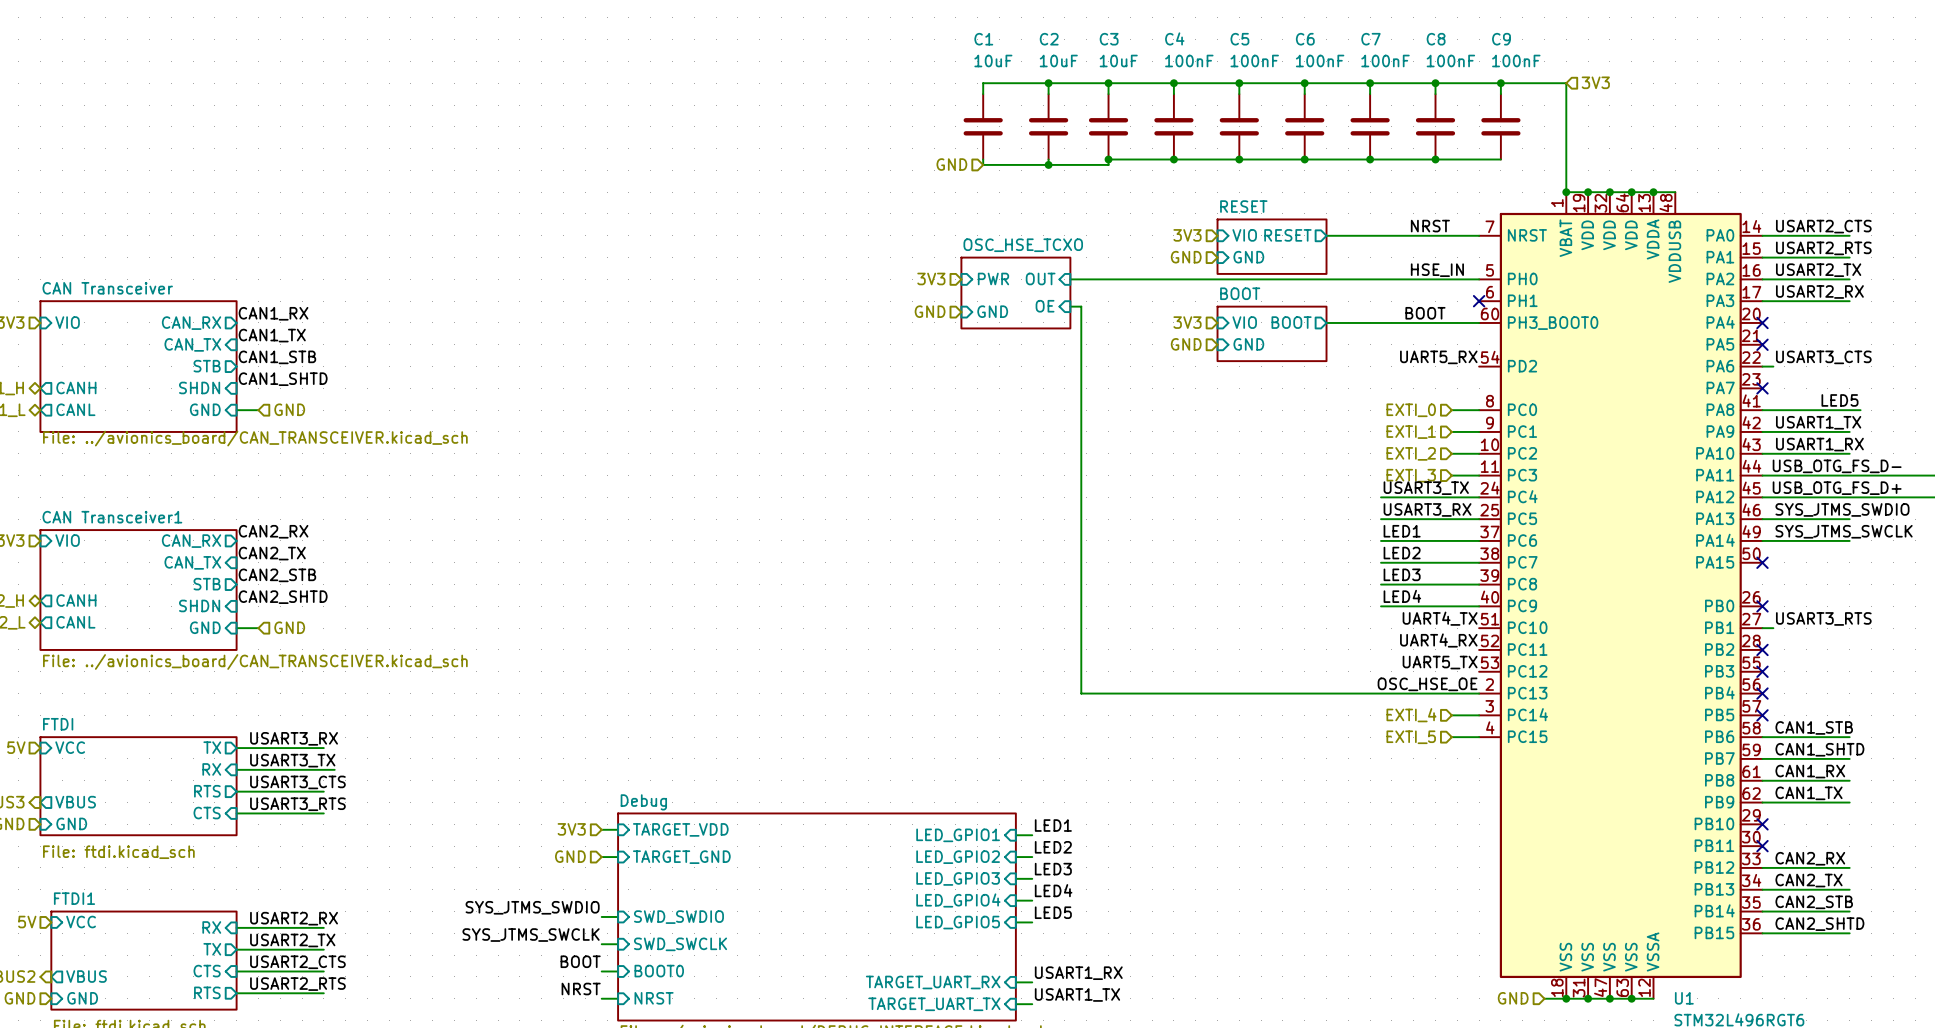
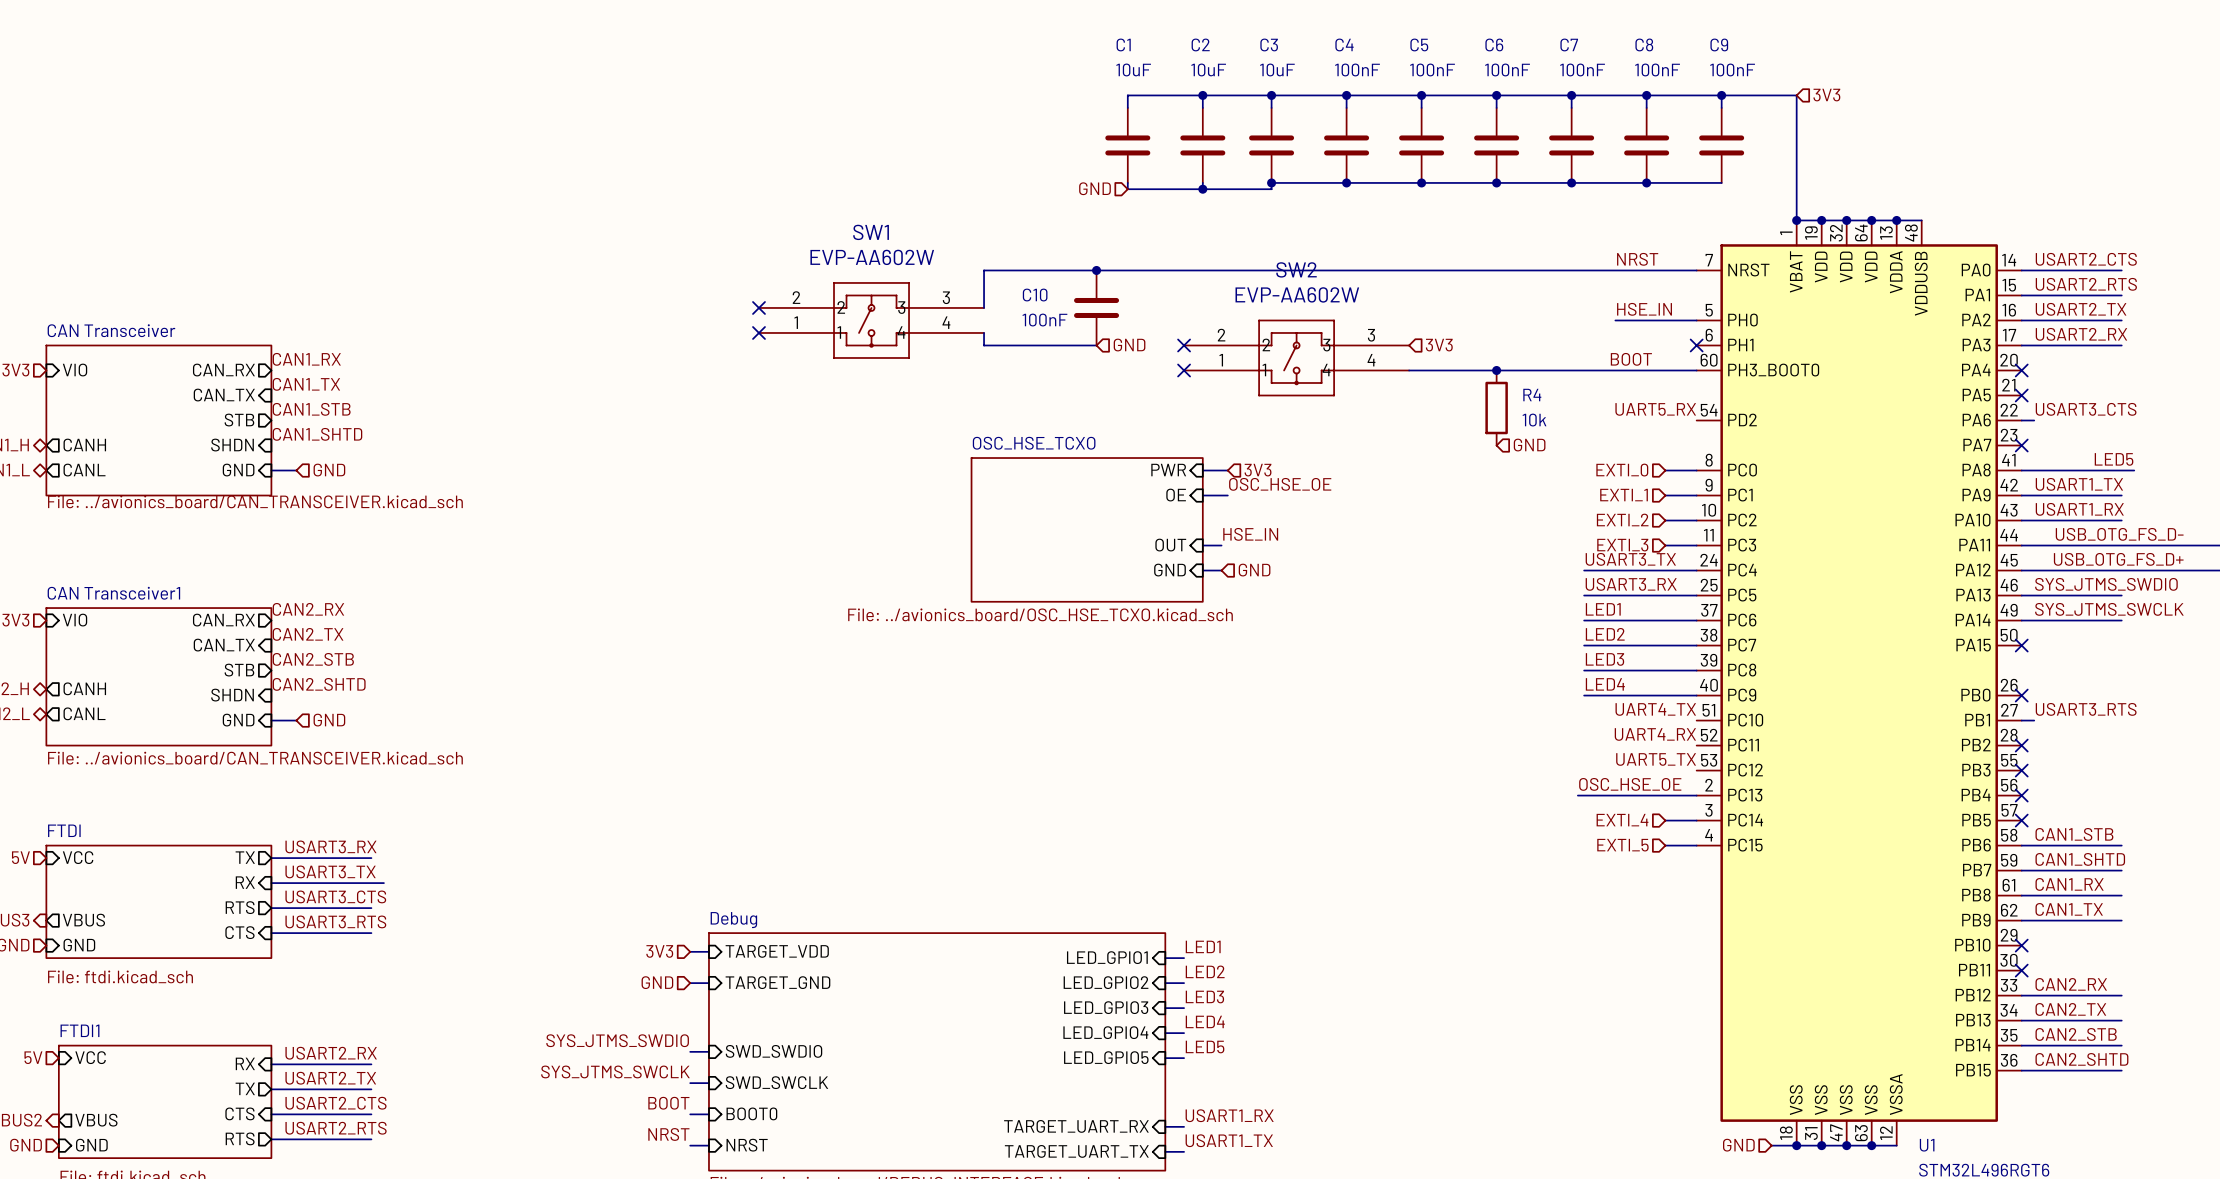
junction: none -> (1096, 270)
hierarchical label: 3V3 (1187, 235) -> none
sheet pin: VIO (1244, 235) -> none
sheet pin: RESET (1287, 235) -> none
wire: none -> (1521, 270) (984, 270) (984, 307)
sheet RESET: (1272, 246) -> none
hierarchical label: GND (1186, 257) -> none
sheet pin: GND (1248, 257) -> none
no-connect mark: none -> (758, 307)
C10: none -> 100nF (1096, 307)
hierarchical label: 3V3 (931, 278) -> none
sheet pin rotation: 0° (993, 278) -> 180° (1168, 470)
sheet pin position: PWR (993, 278) -> PWR (1168, 470)
sheet pin position: OUT (1040, 278) -> OUT (1170, 545)
SW1: none -> EVP-AA602W (871, 320)
wire: (1070, 279) (1408, 279) -> none
no-connect mark: none -> (758, 332)
wire: none -> (984, 332) (984, 345) (1096, 345)
sheet OSC_HSE_TCXO: (1015, 293) -> none
hierarchical label: none -> 3V3 (1439, 345)
no-connect mark: none -> (1184, 345)
sheet pin position: OE (1045, 306) -> OE (1176, 495)
wire: (1070, 306) (1081, 306) (1081, 693) (1375, 693) -> none
hierarchical label rotation: 0° (930, 311) -> 180° (1129, 345)
hierarchical label position: GND (930, 311) -> GND (1129, 345)
sheet pin: GND (992, 311) -> none
SW2: none -> EVP-AA602W (1296, 357)
no-connect mark: none -> (1184, 370)
hierarchical label: 3V3 (1187, 322) -> none
wire: none -> (1409, 370) (1521, 370)
sheet pin: VIO (1244, 322) -> none
sheet pin: BOOT (1291, 322) -> none
junction: none -> (1496, 370)
sheet BOOT: (1272, 333) -> none
hierarchical label: GND (1186, 344) -> none
sheet pin: GND (1248, 344) -> none
R4: none -> 10k (1496, 408)
hierarchical label: none -> GND (1529, 445)
hierarchical label: none -> 3V3 (1258, 470)
wire: none -> (1202, 470) (1227, 470)
label: none -> OSC_HSE_OE (1280, 484)
wire: none -> (1202, 495) (1227, 495)
sheet OSC_HSE_TCXO: none -> File: ../avionics_board/OSC_HSE_TCXO.kicad_sch (1087, 529)
label: none -> HSE_IN (1250, 534)
wire: none -> (1202, 545) (1221, 545)
sheet pin: none -> GND (1170, 570)
hierarchical label: none -> GND (1254, 570)
wire: none -> (1202, 570) (1221, 570)

